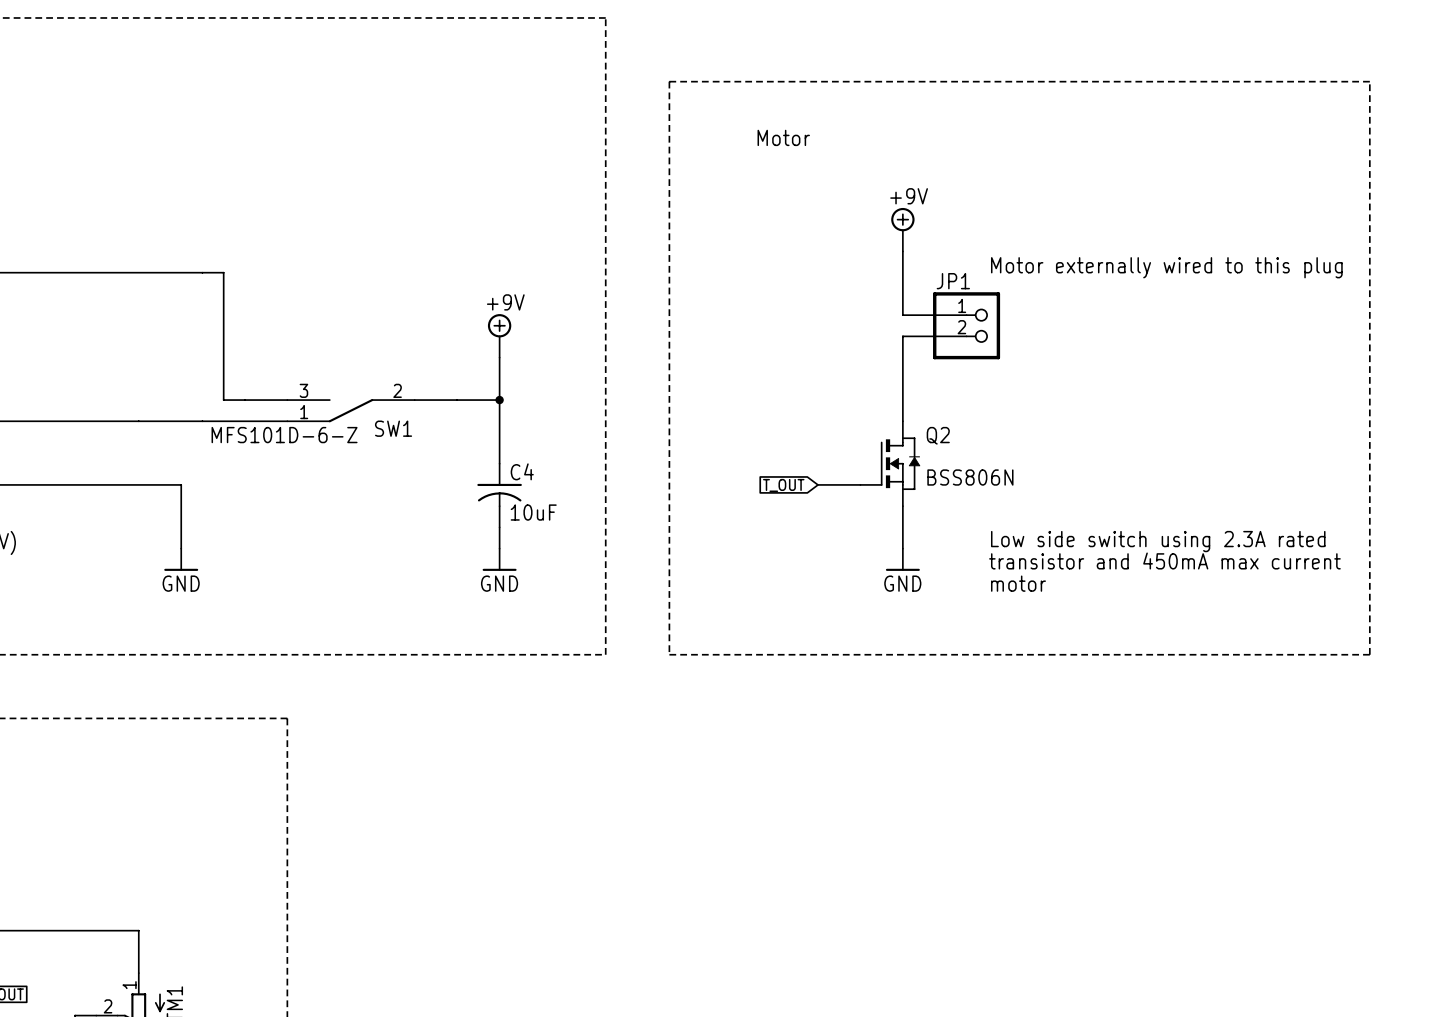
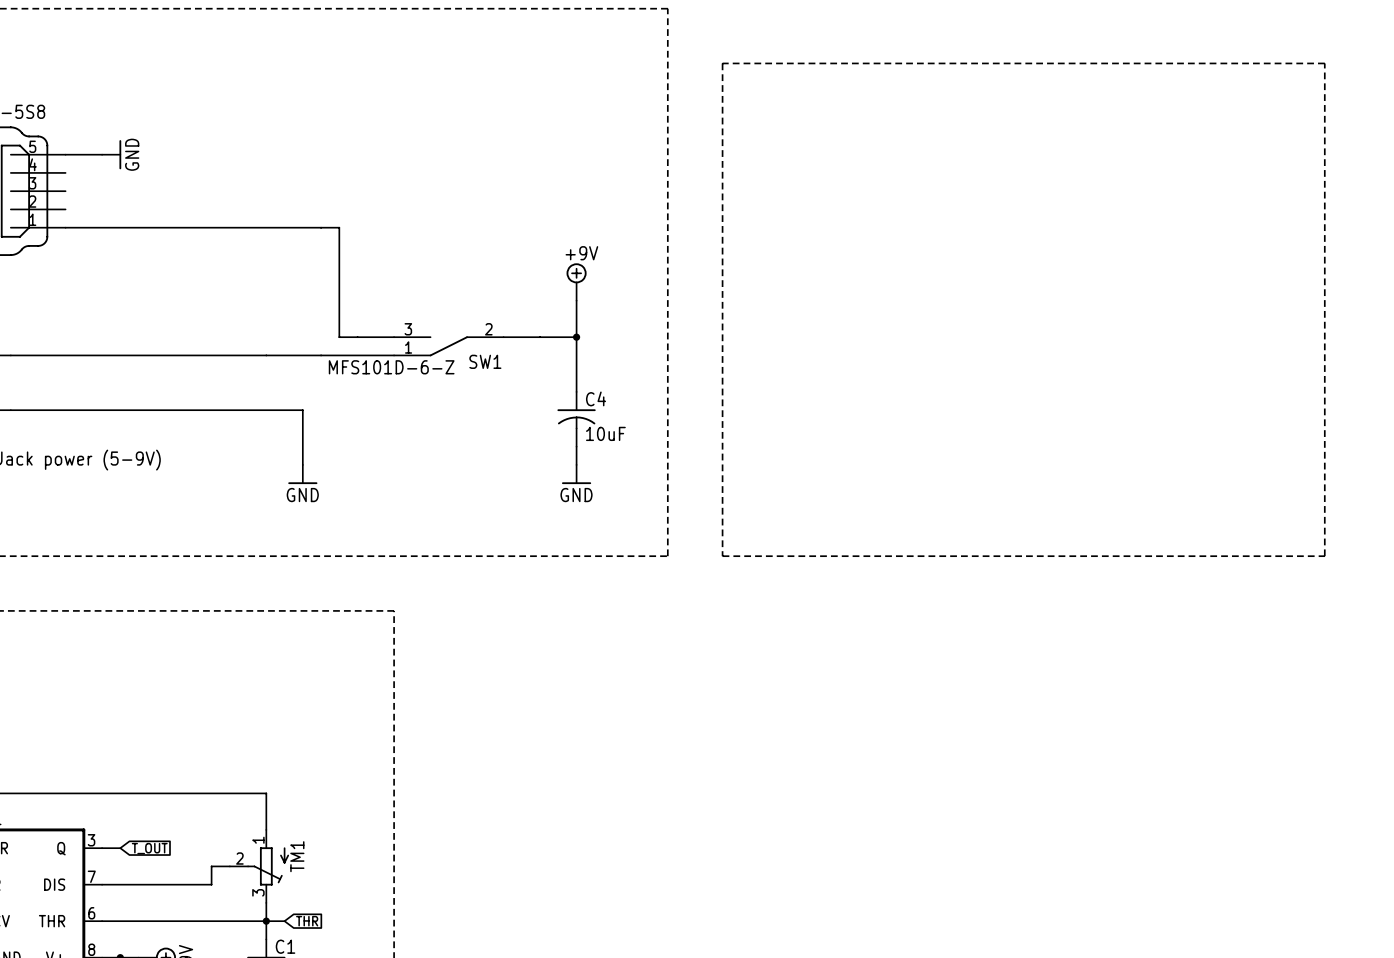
text: Motor (783, 137) -> none
power symbol: +9V (902, 229) -> none
wire: (902, 251) (902, 315) (966, 315) -> none
text: Motor externally wired to this plug (1166, 267) -> none
JP1: (966, 325) -> none
wire: (966, 336) (902, 336) (902, 421) -> none
Q2: BSS806N (890, 463) -> none
wire: (817, 484) (860, 484) -> none
global label: T_OUT (783, 485) -> none
wire: (902, 506) (902, 548) -> none
text: Low side switch using 2.3A rated (1158, 541) -> none
power symbol: GND (902, 559) -> none
text: transistor and 450mA max current (1164, 561) -> none
text: motor (1018, 583) -> none

